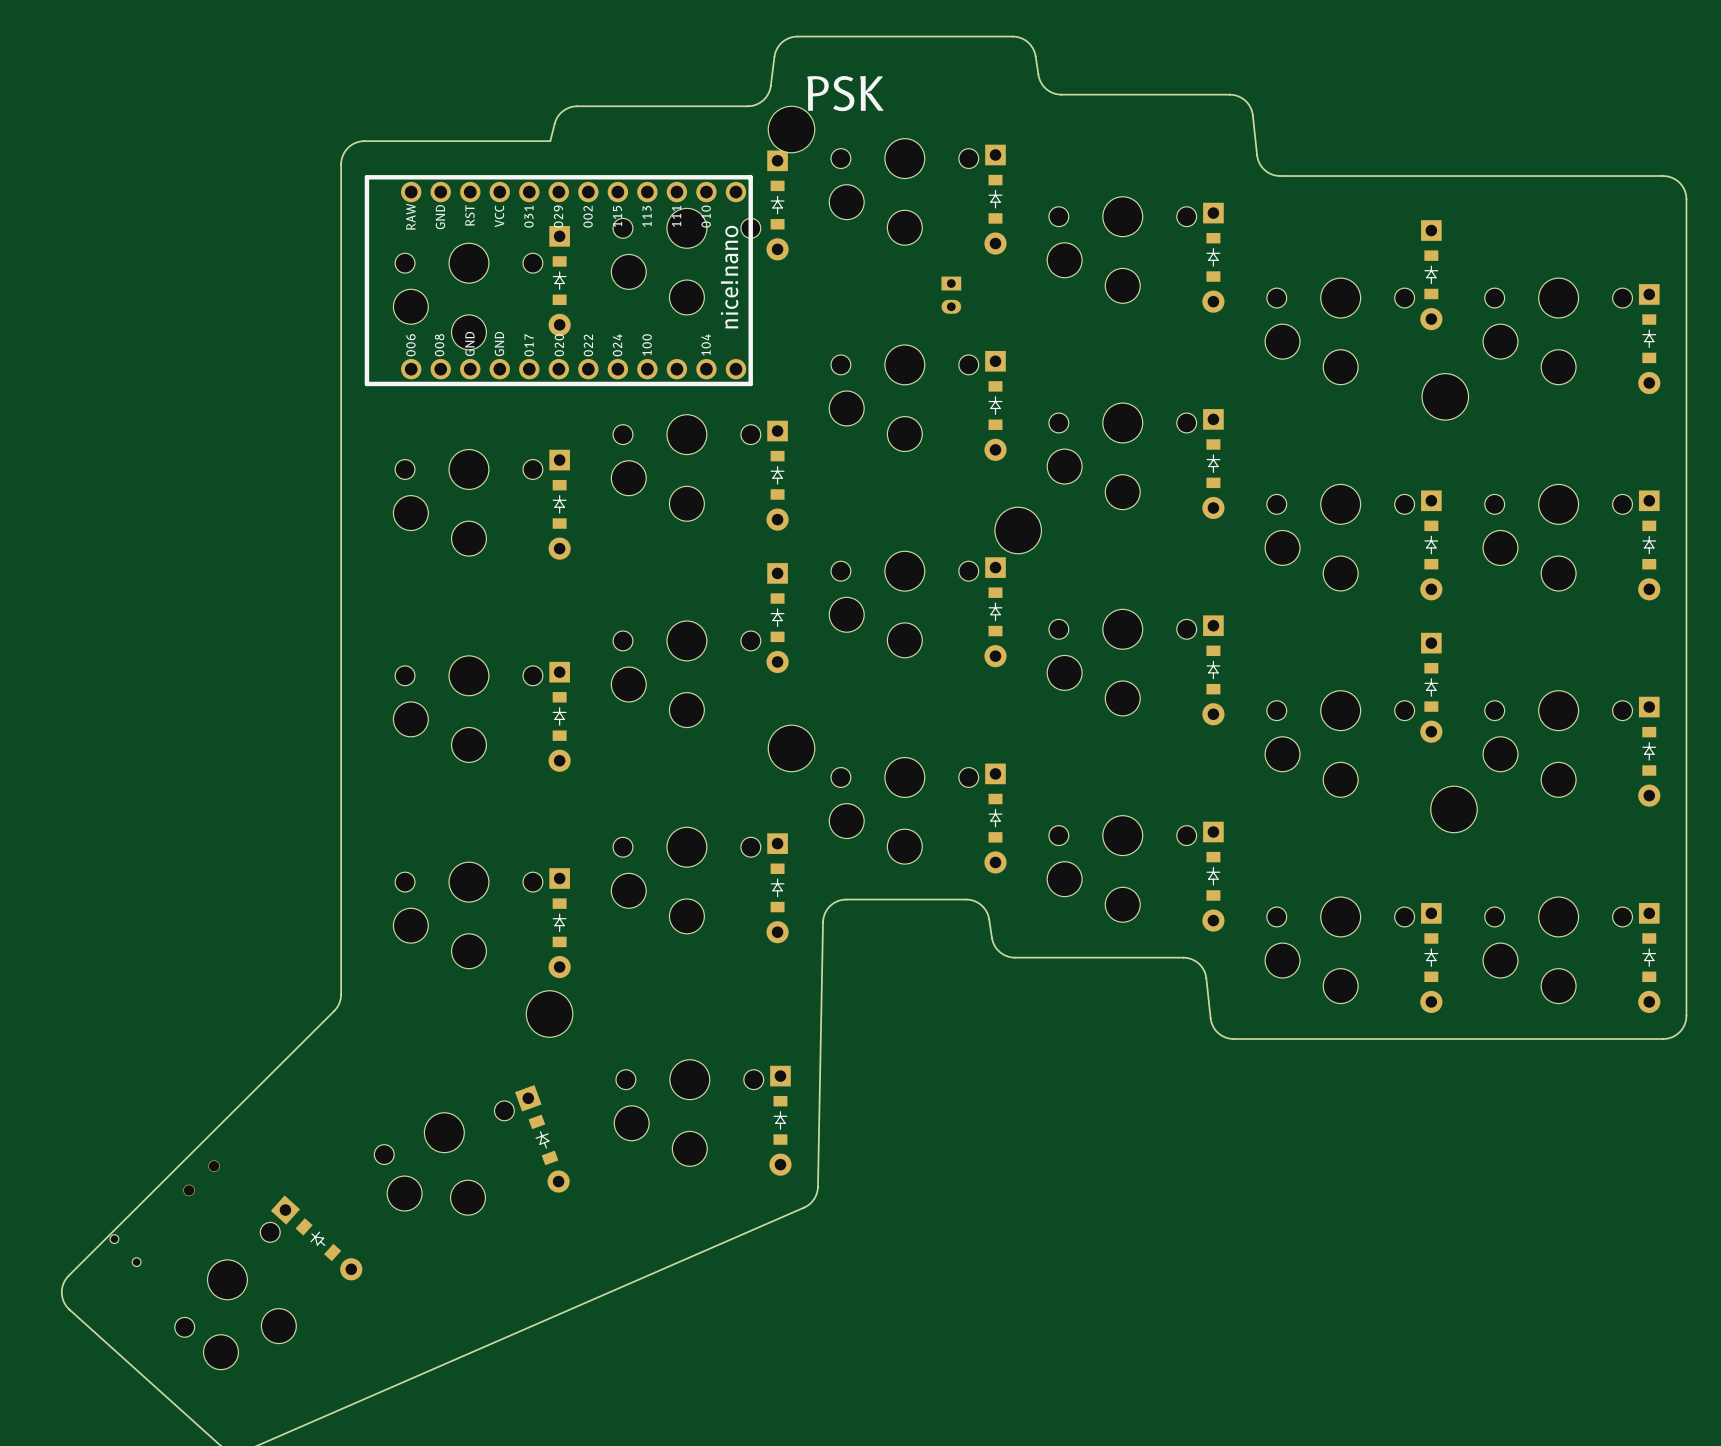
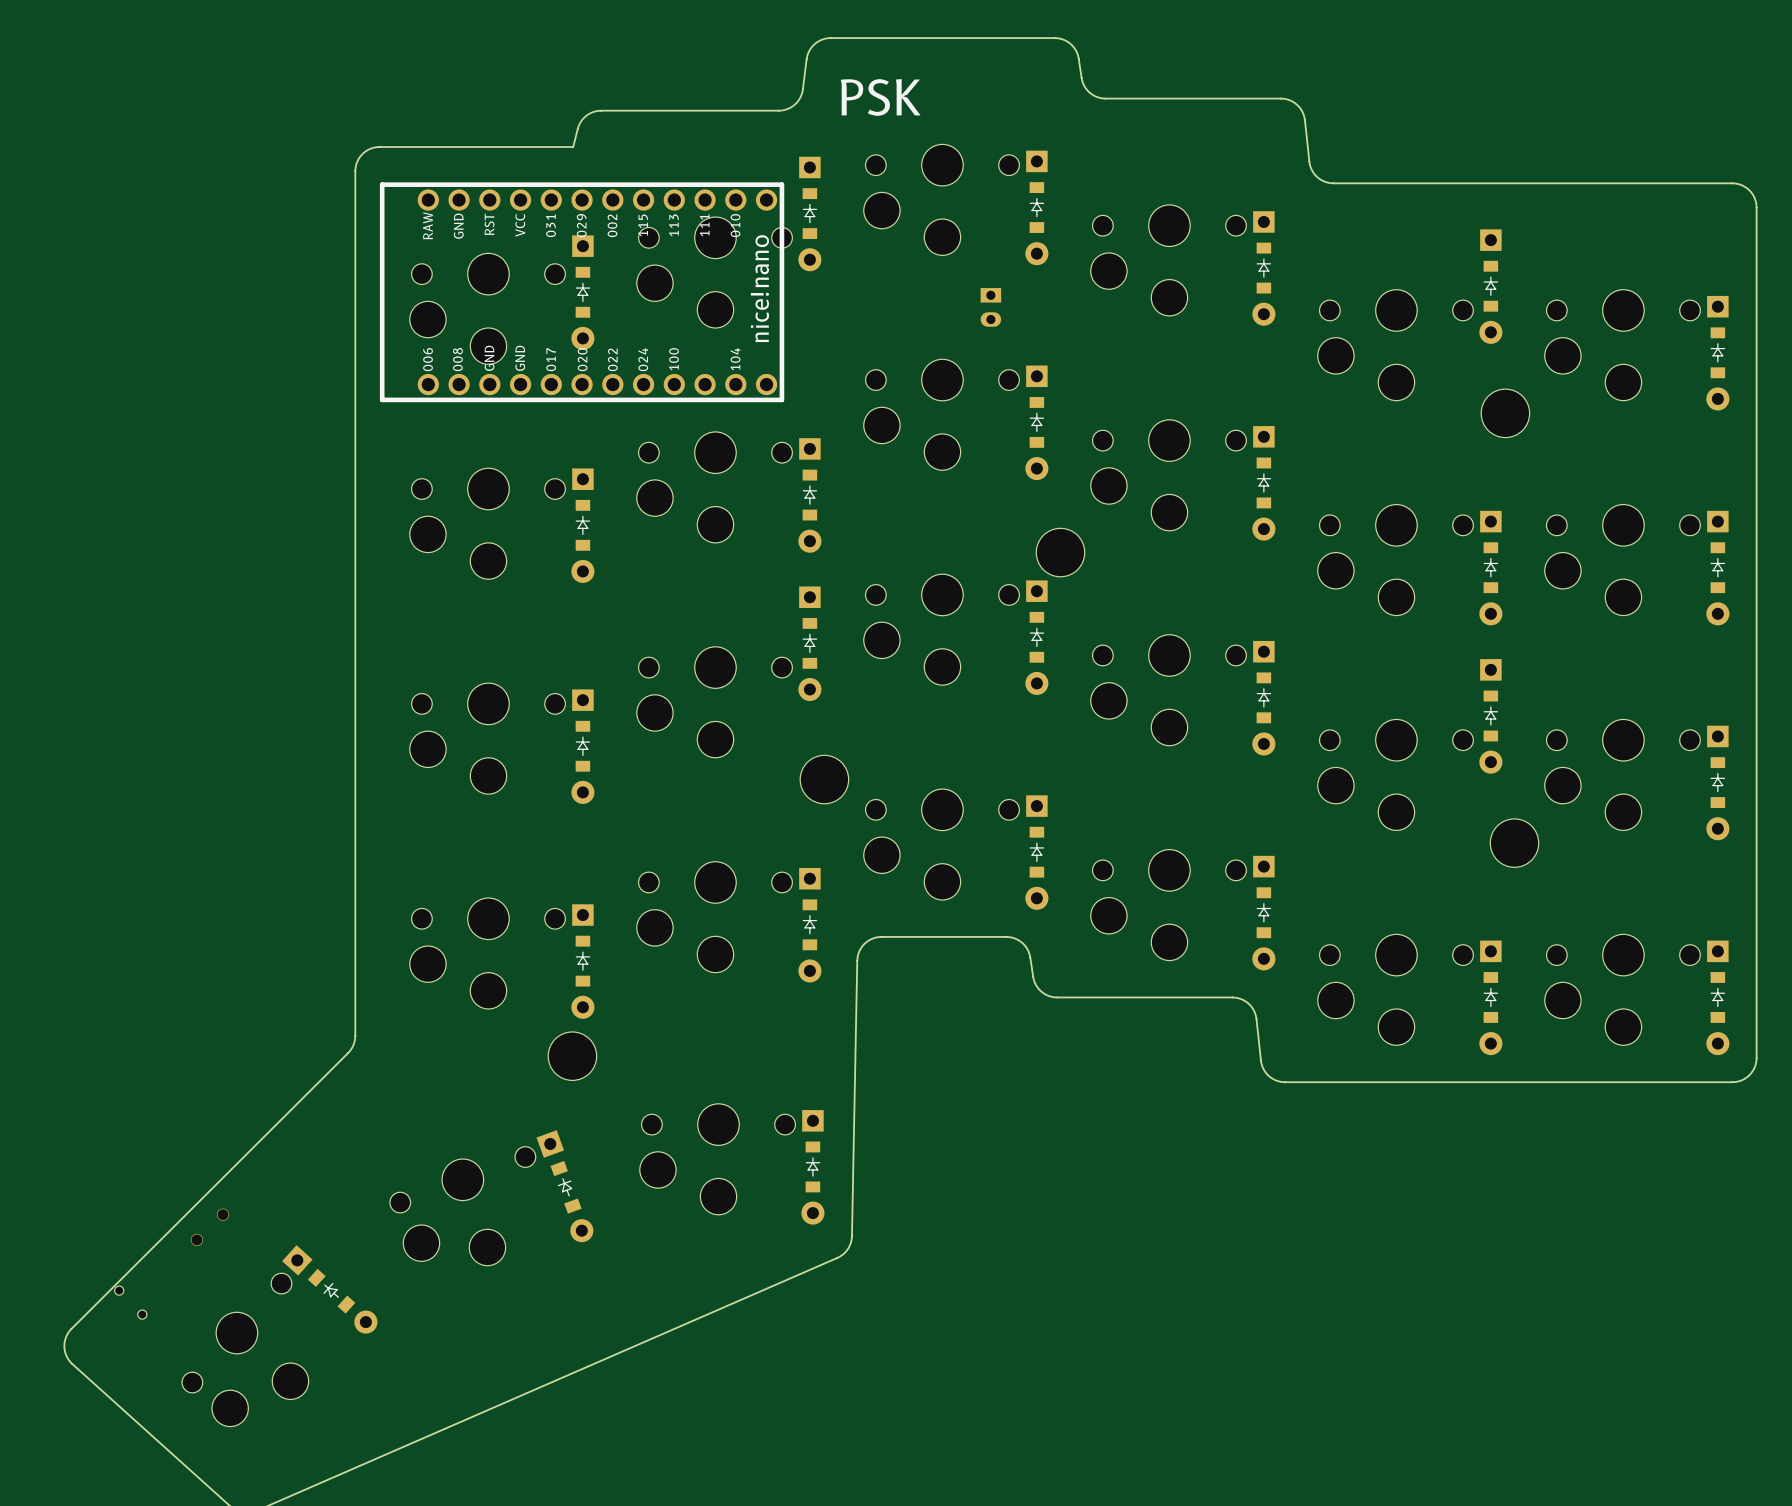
part: (791, 129) -> none

